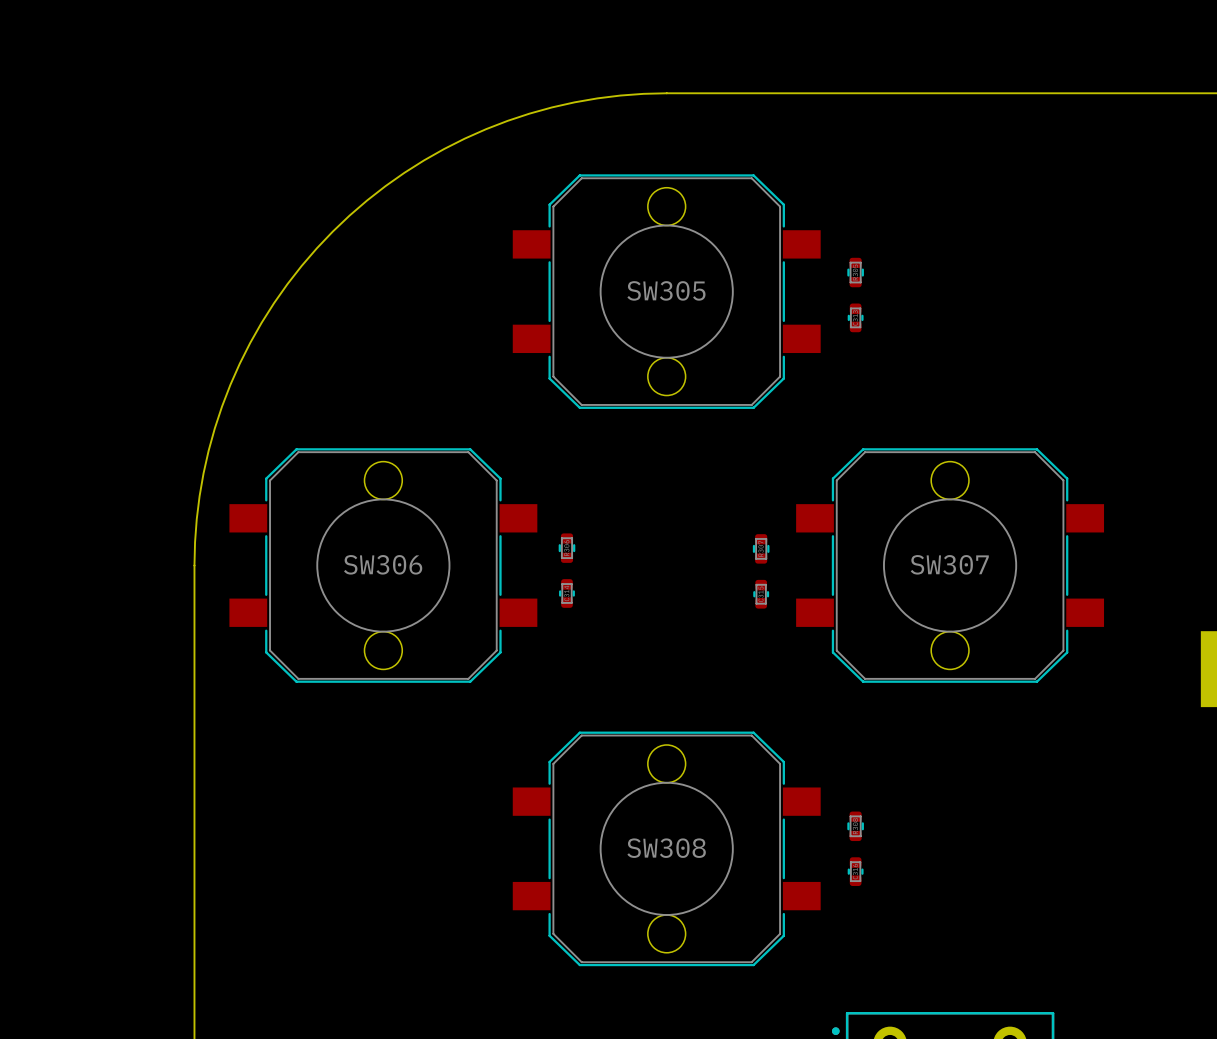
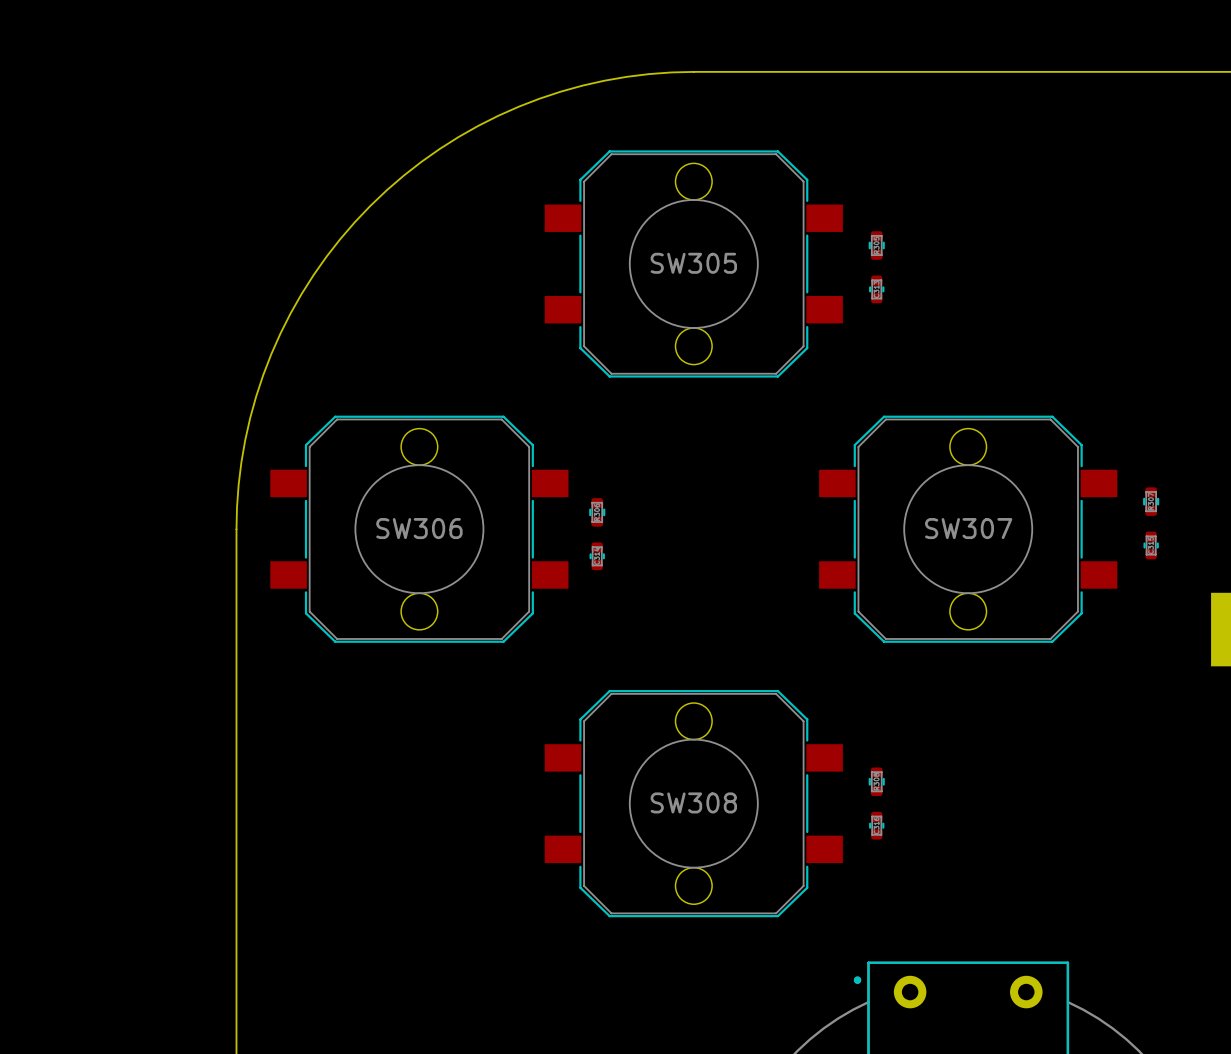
part position: (761, 548) -> (1151, 501)
part position: (761, 594) -> (1151, 545)

